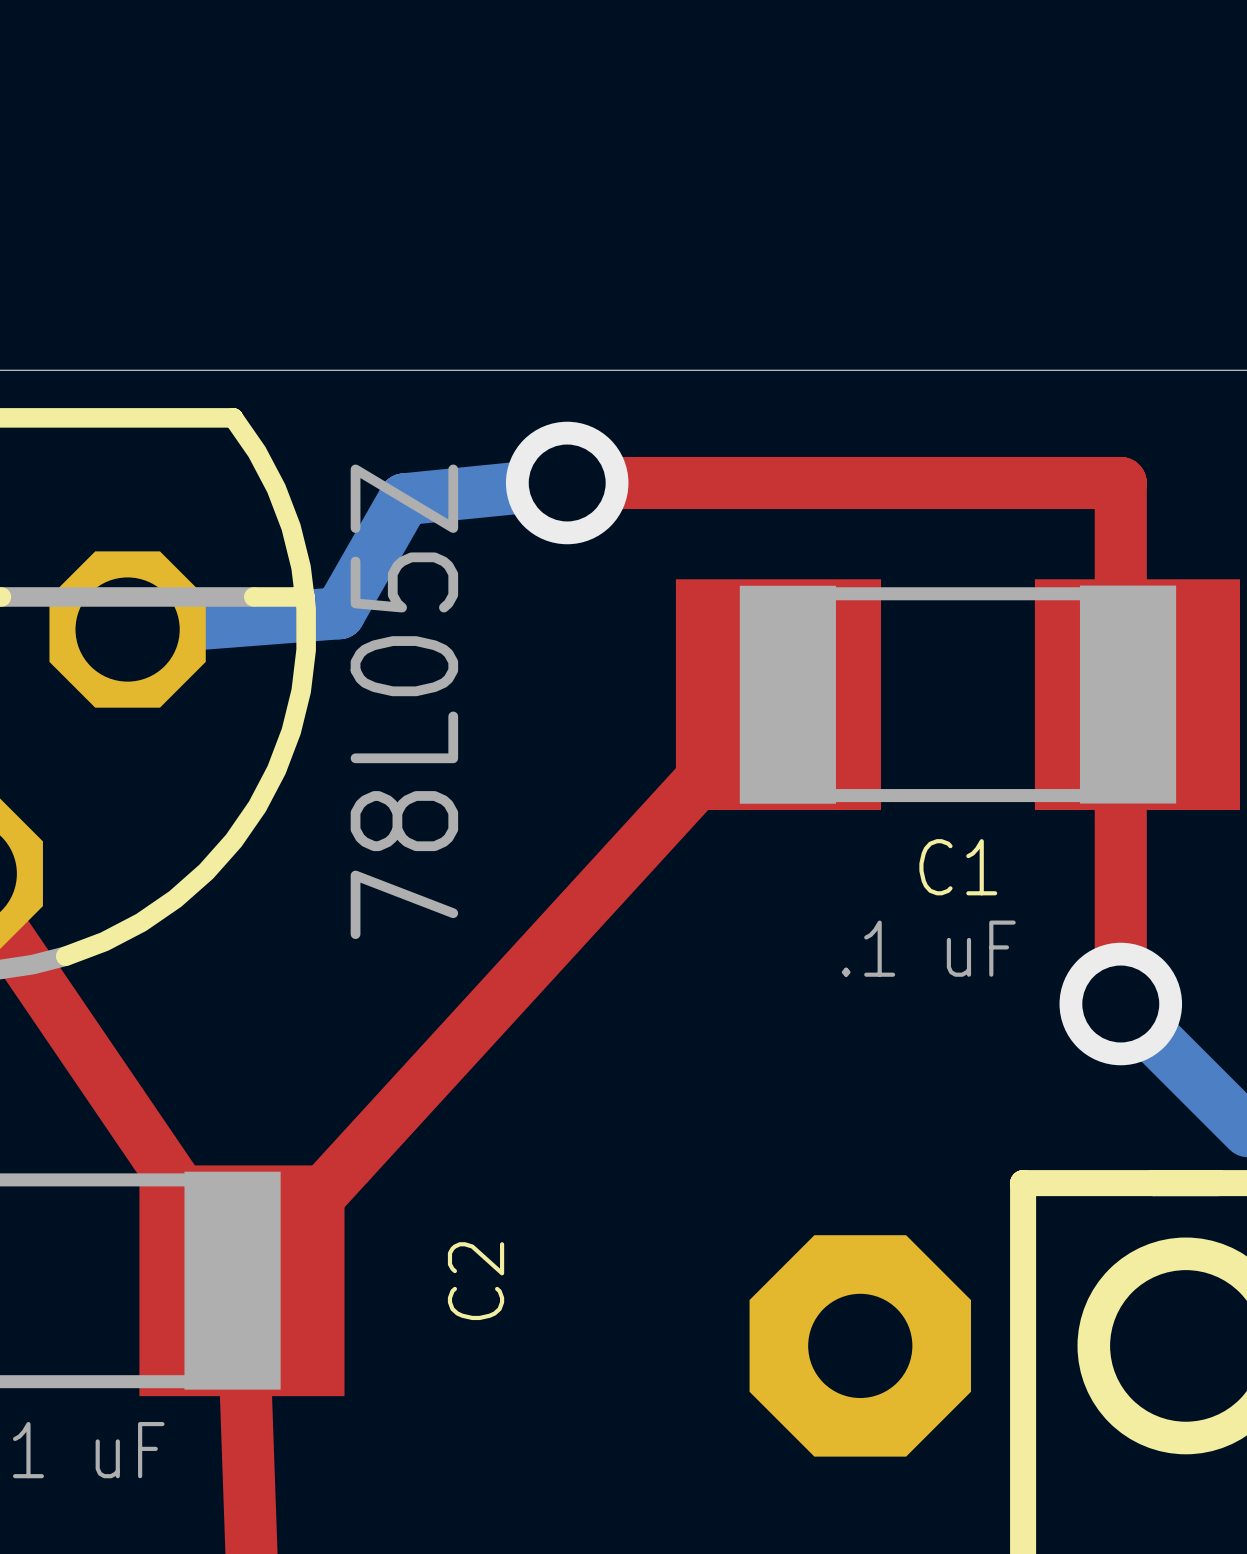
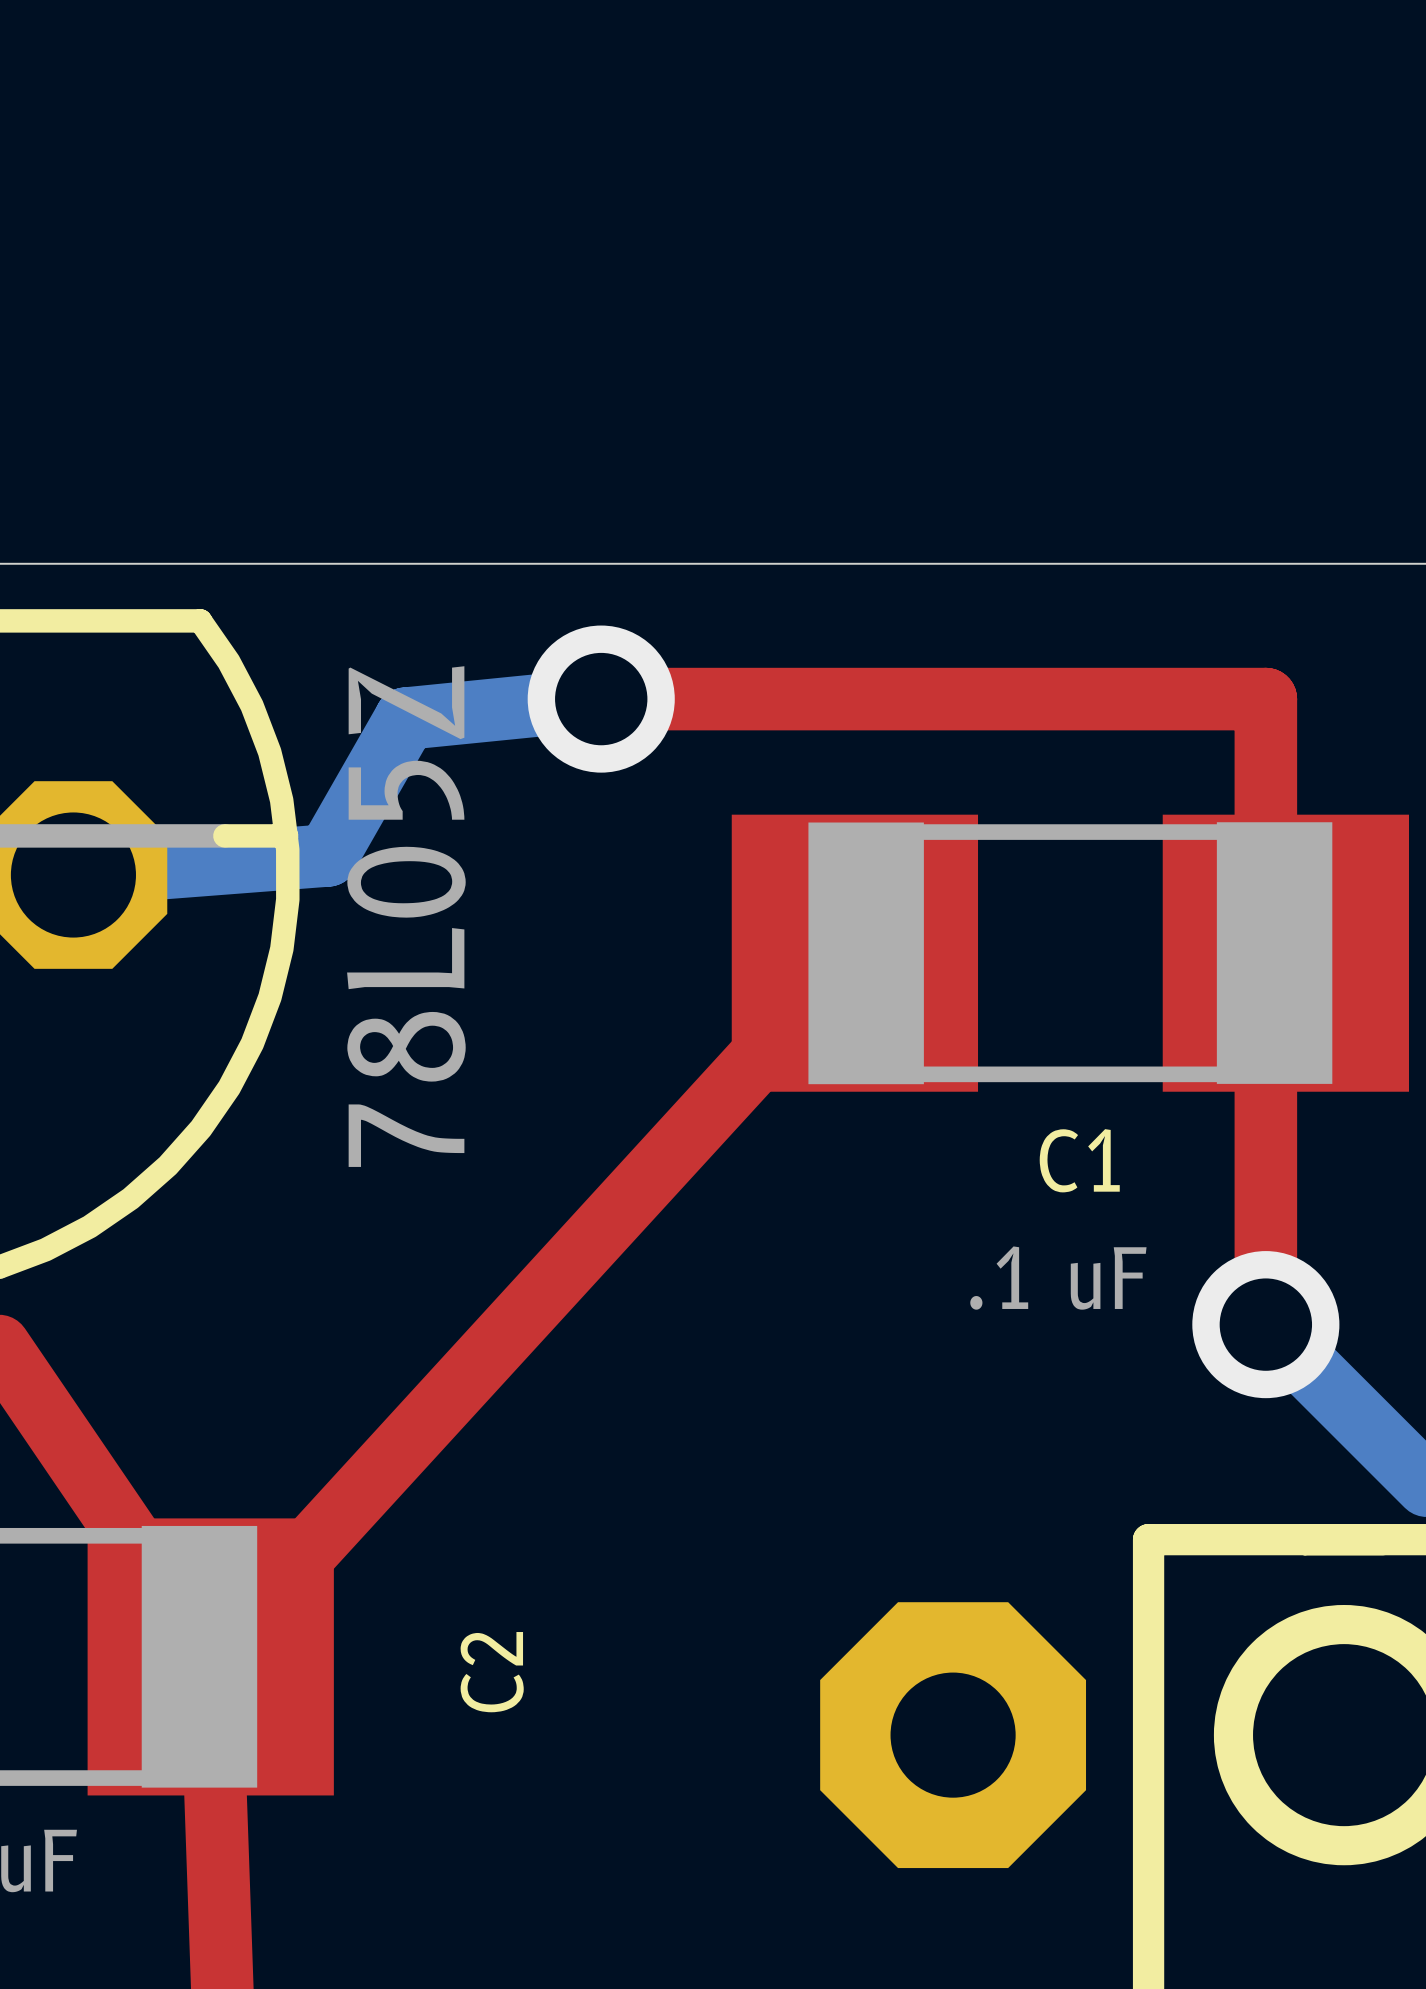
C1 value position: .1 uF (928, 948) -> .1 uF (1058, 1278)

